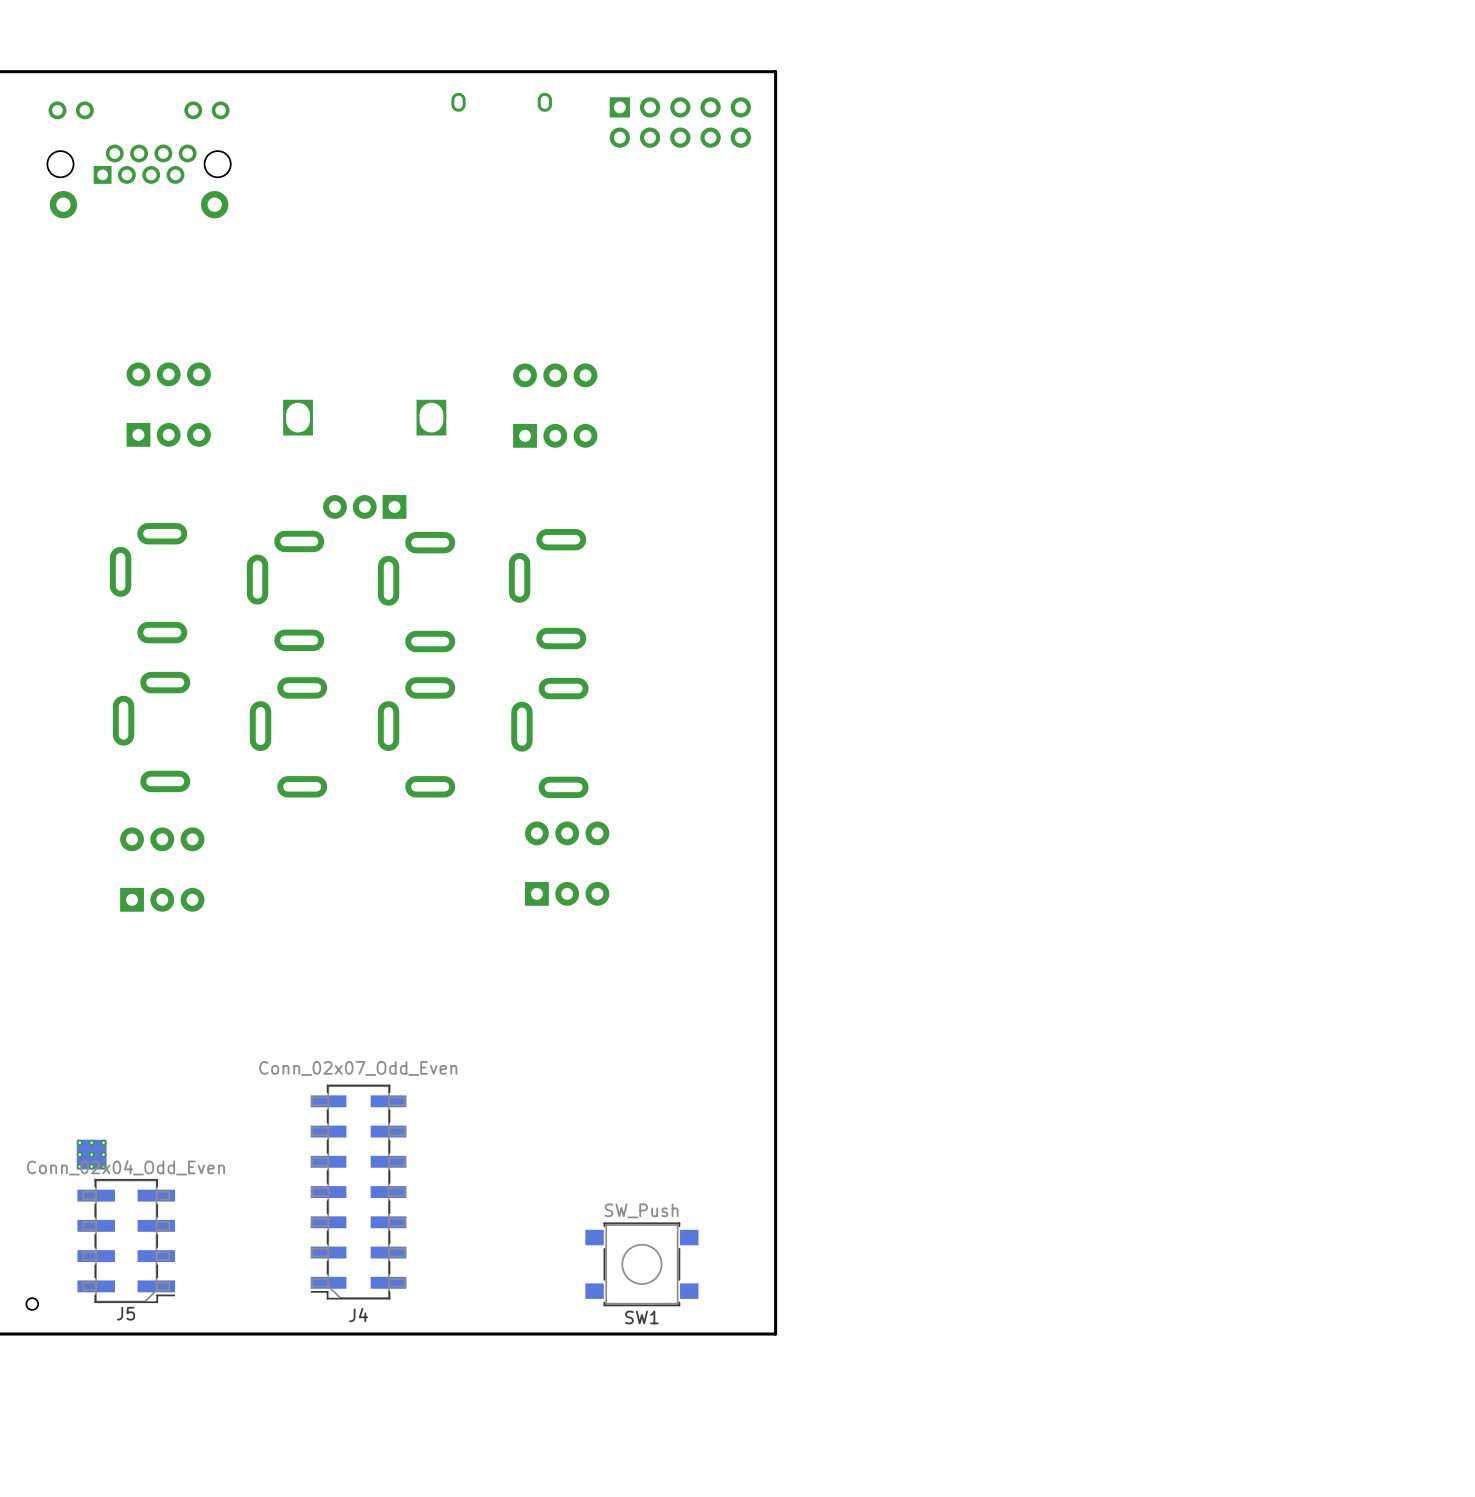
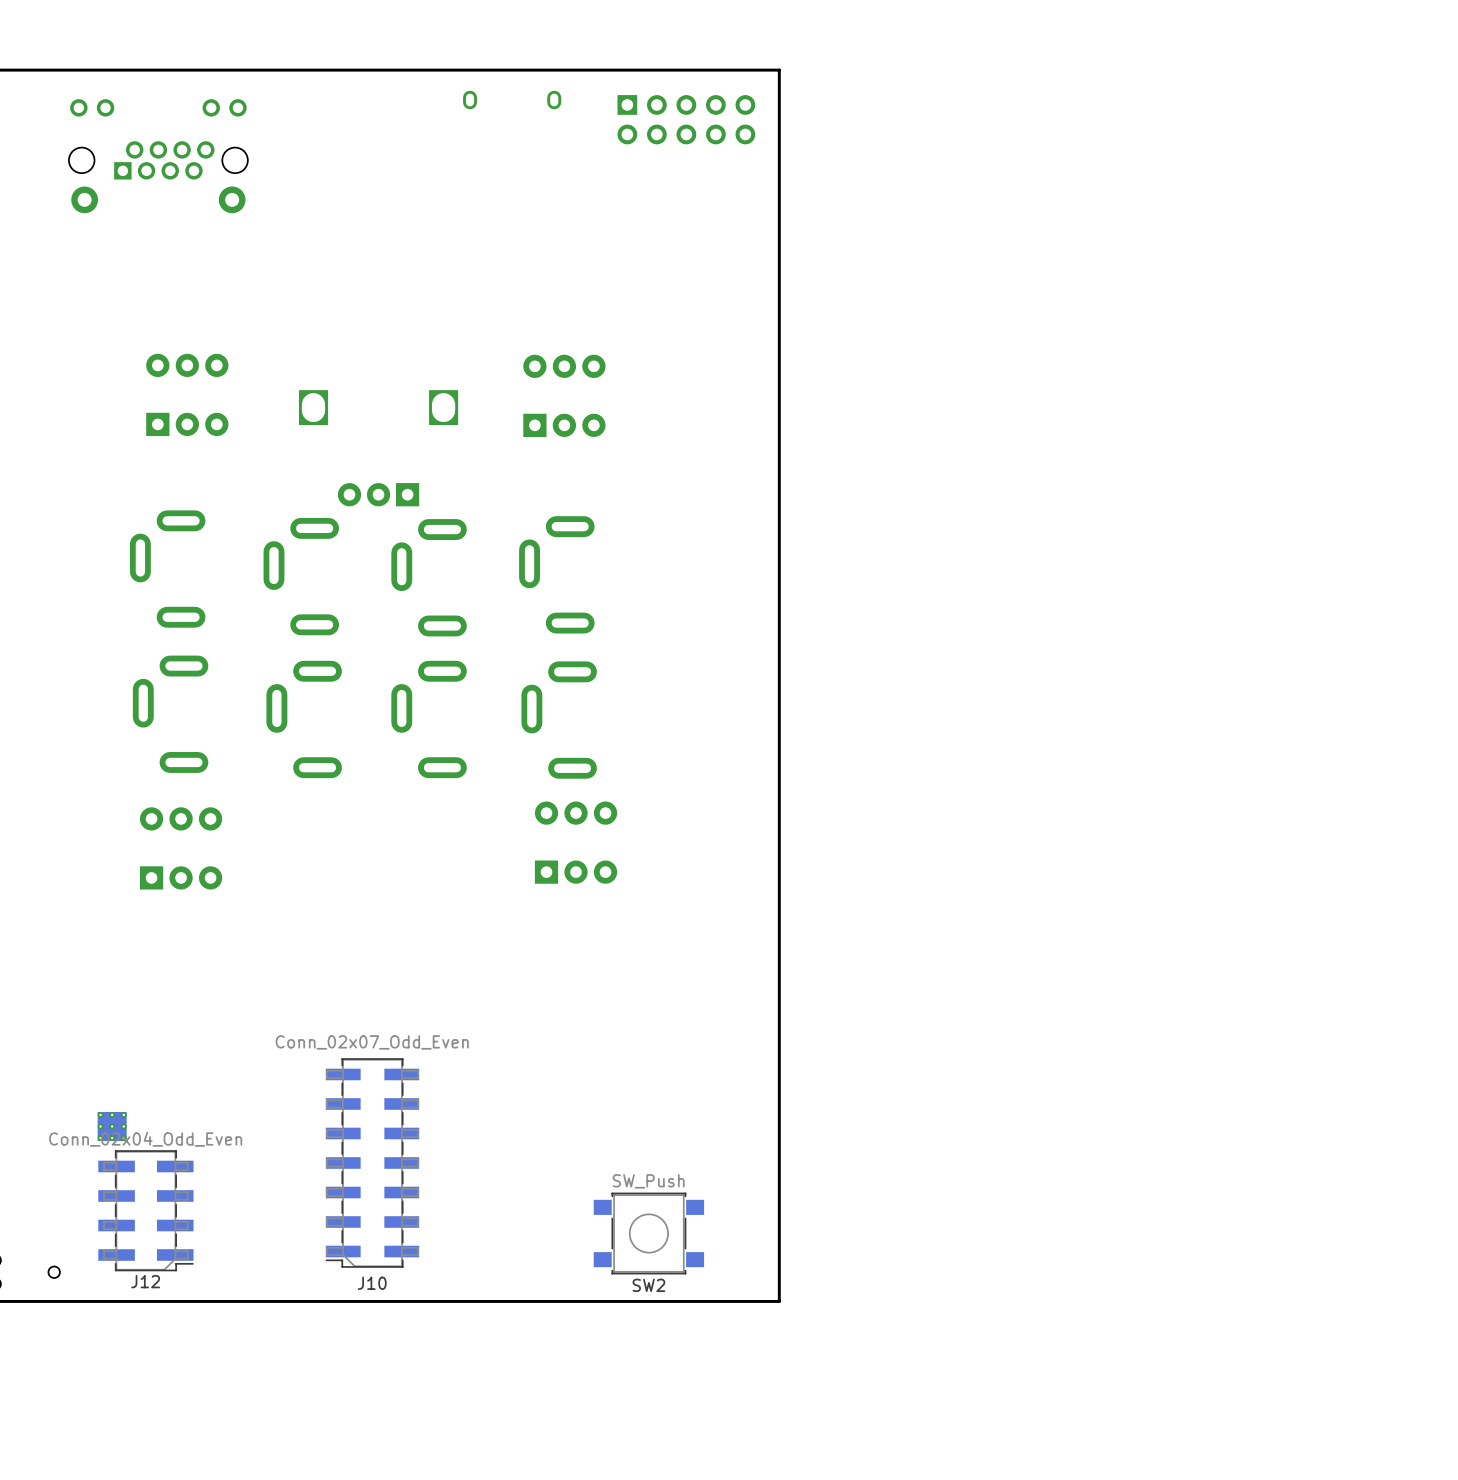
J5 name: J5 (125, 1313) -> J12 (145, 1281)
J4 name: J4 (358, 1315) -> J10 (372, 1283)
SW1 name: SW1 (641, 1317) -> SW2 (648, 1285)

